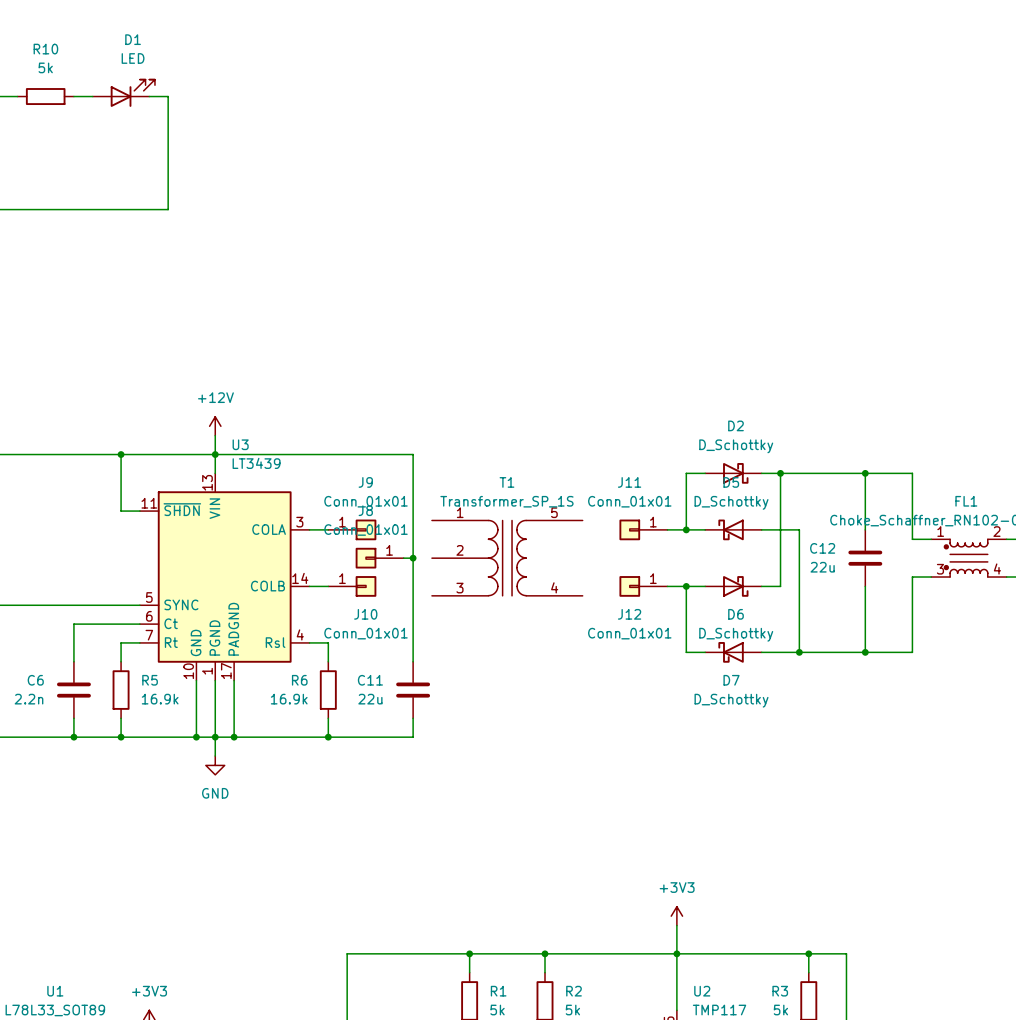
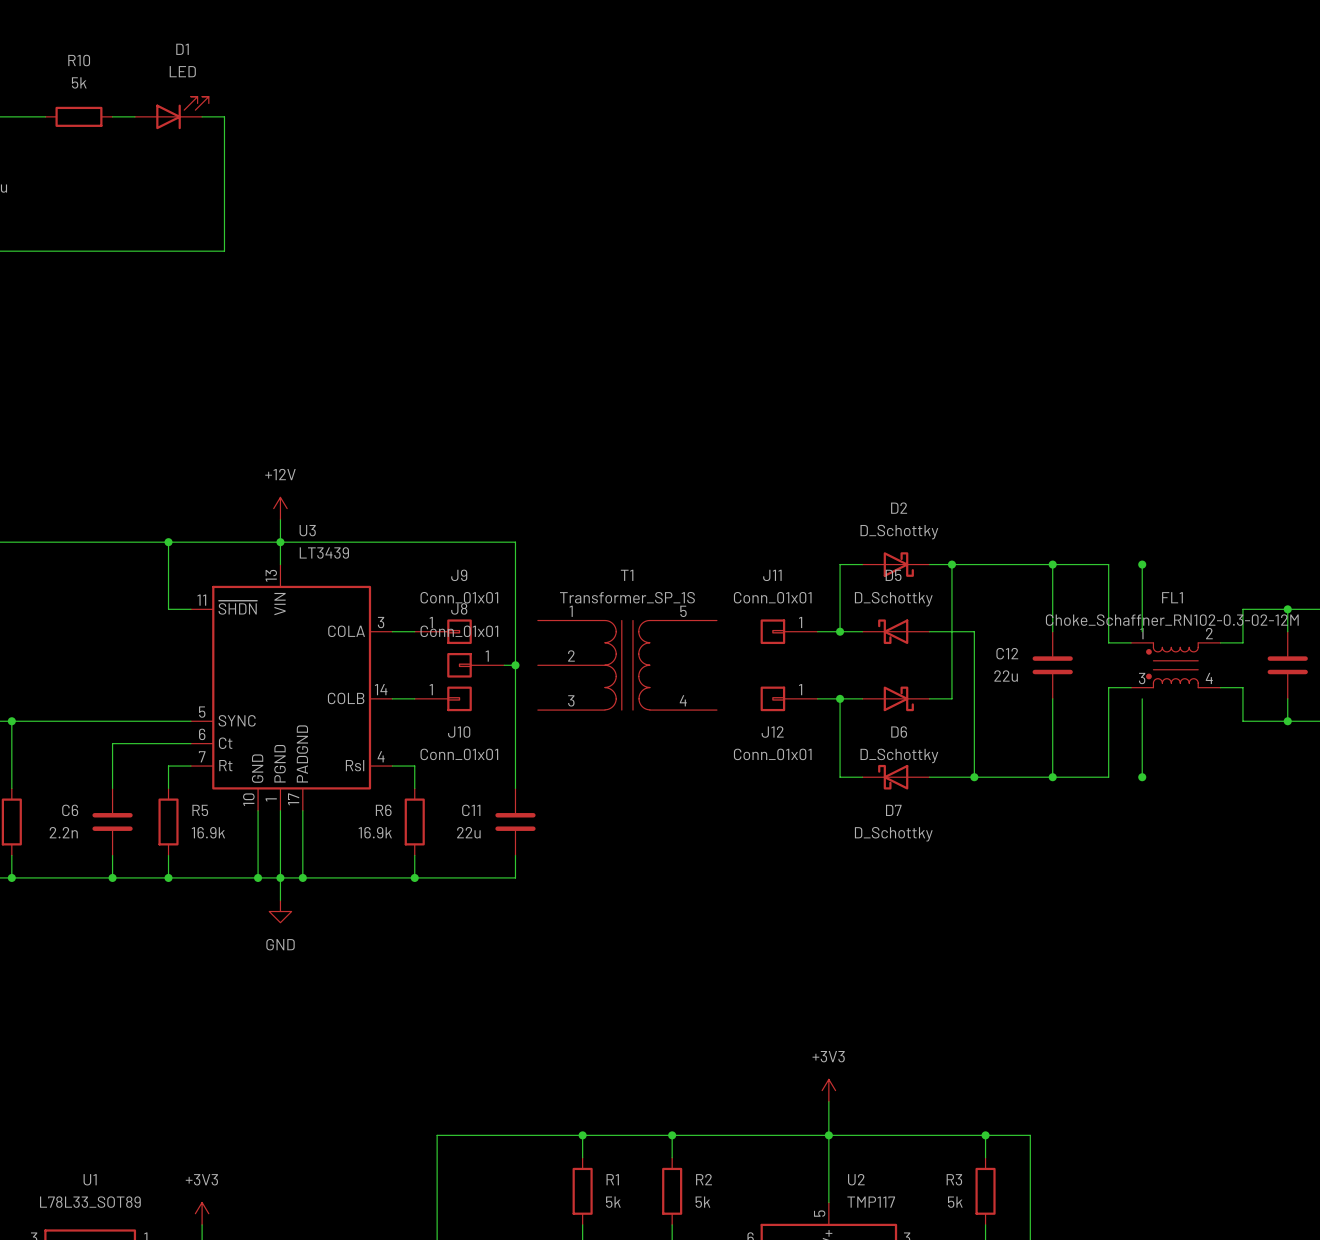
wire: none -> (1142, 564) (1142, 631)
junction: none -> (1142, 564)
wire: none -> (1142, 698) (1142, 777)
junction: none -> (1142, 777)

